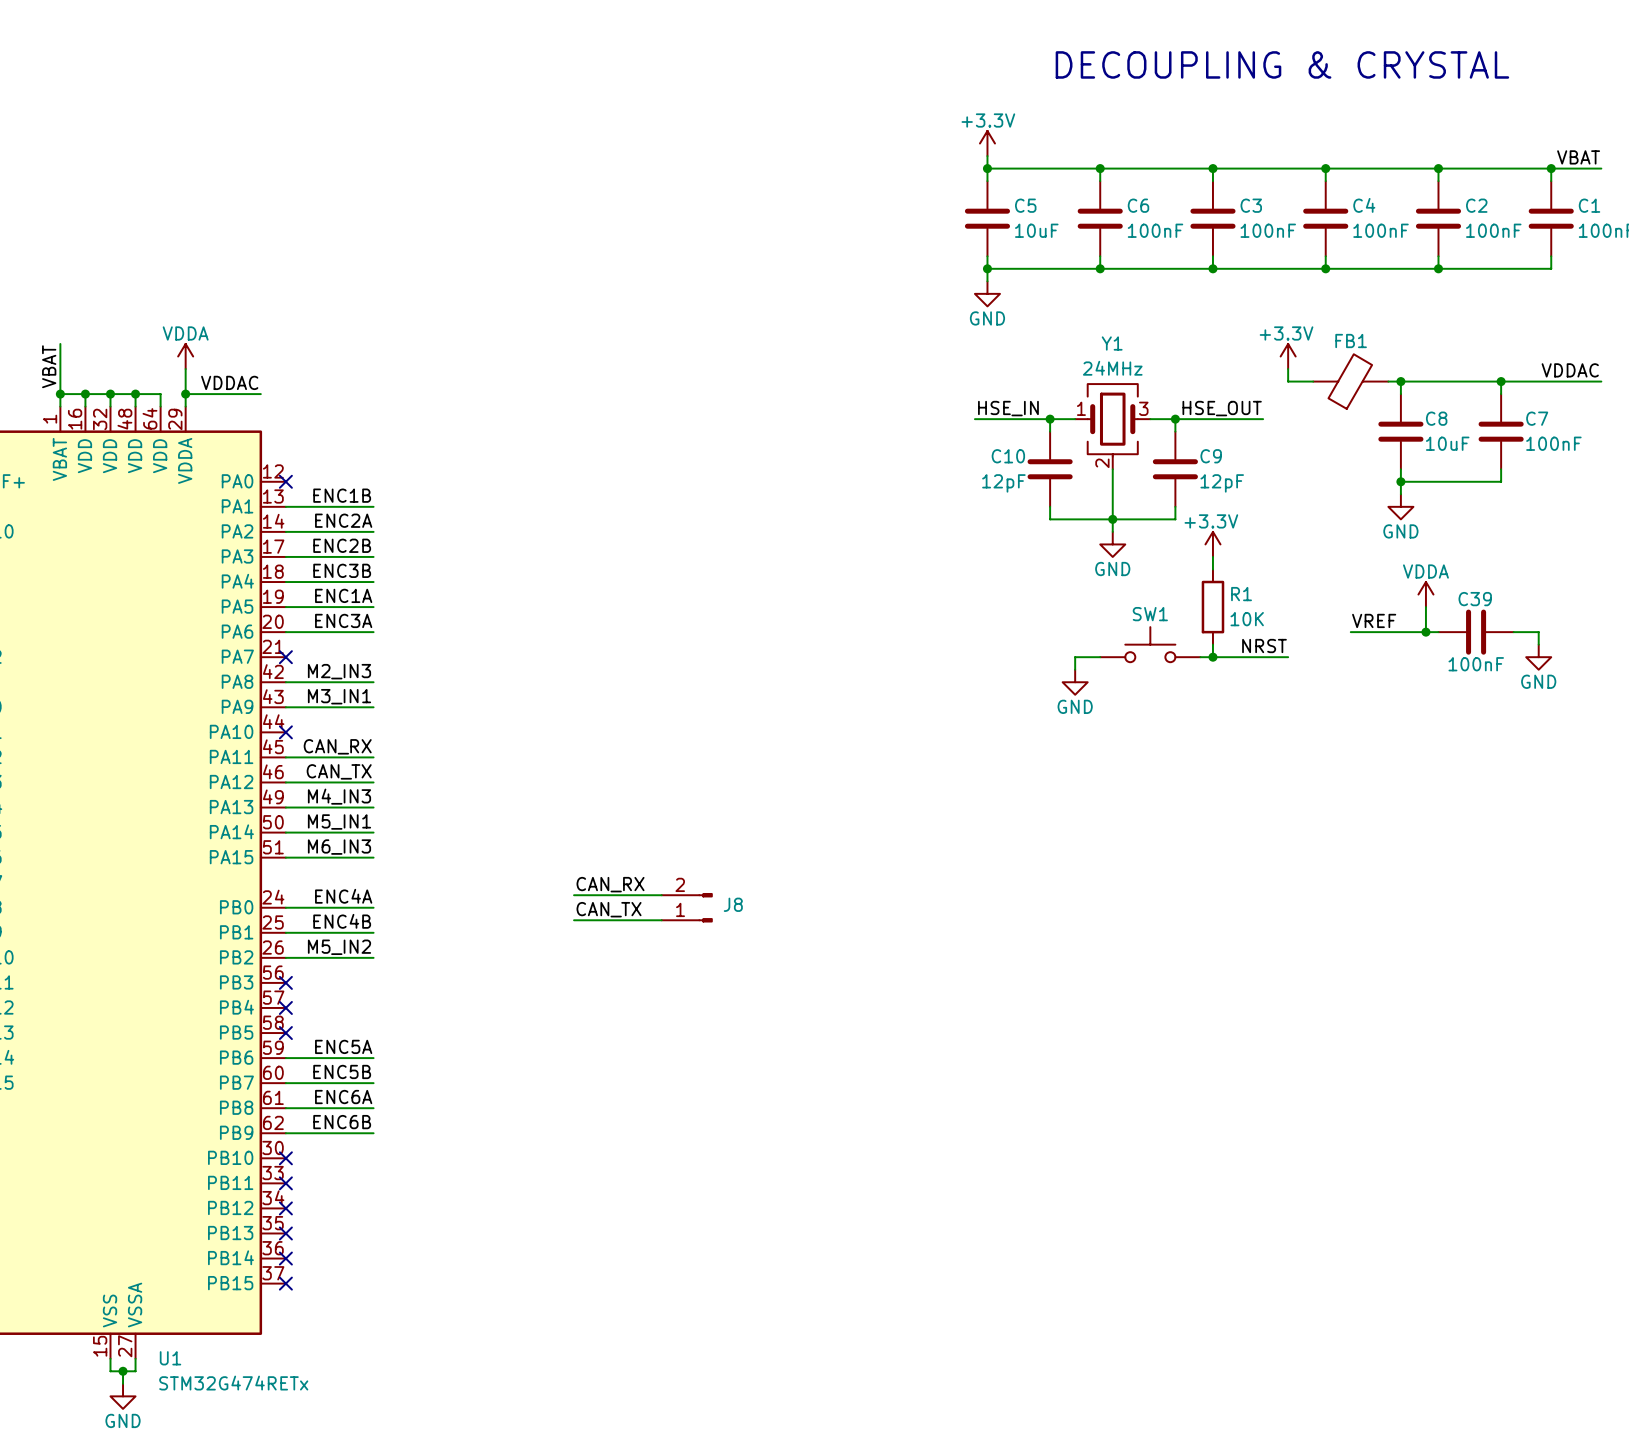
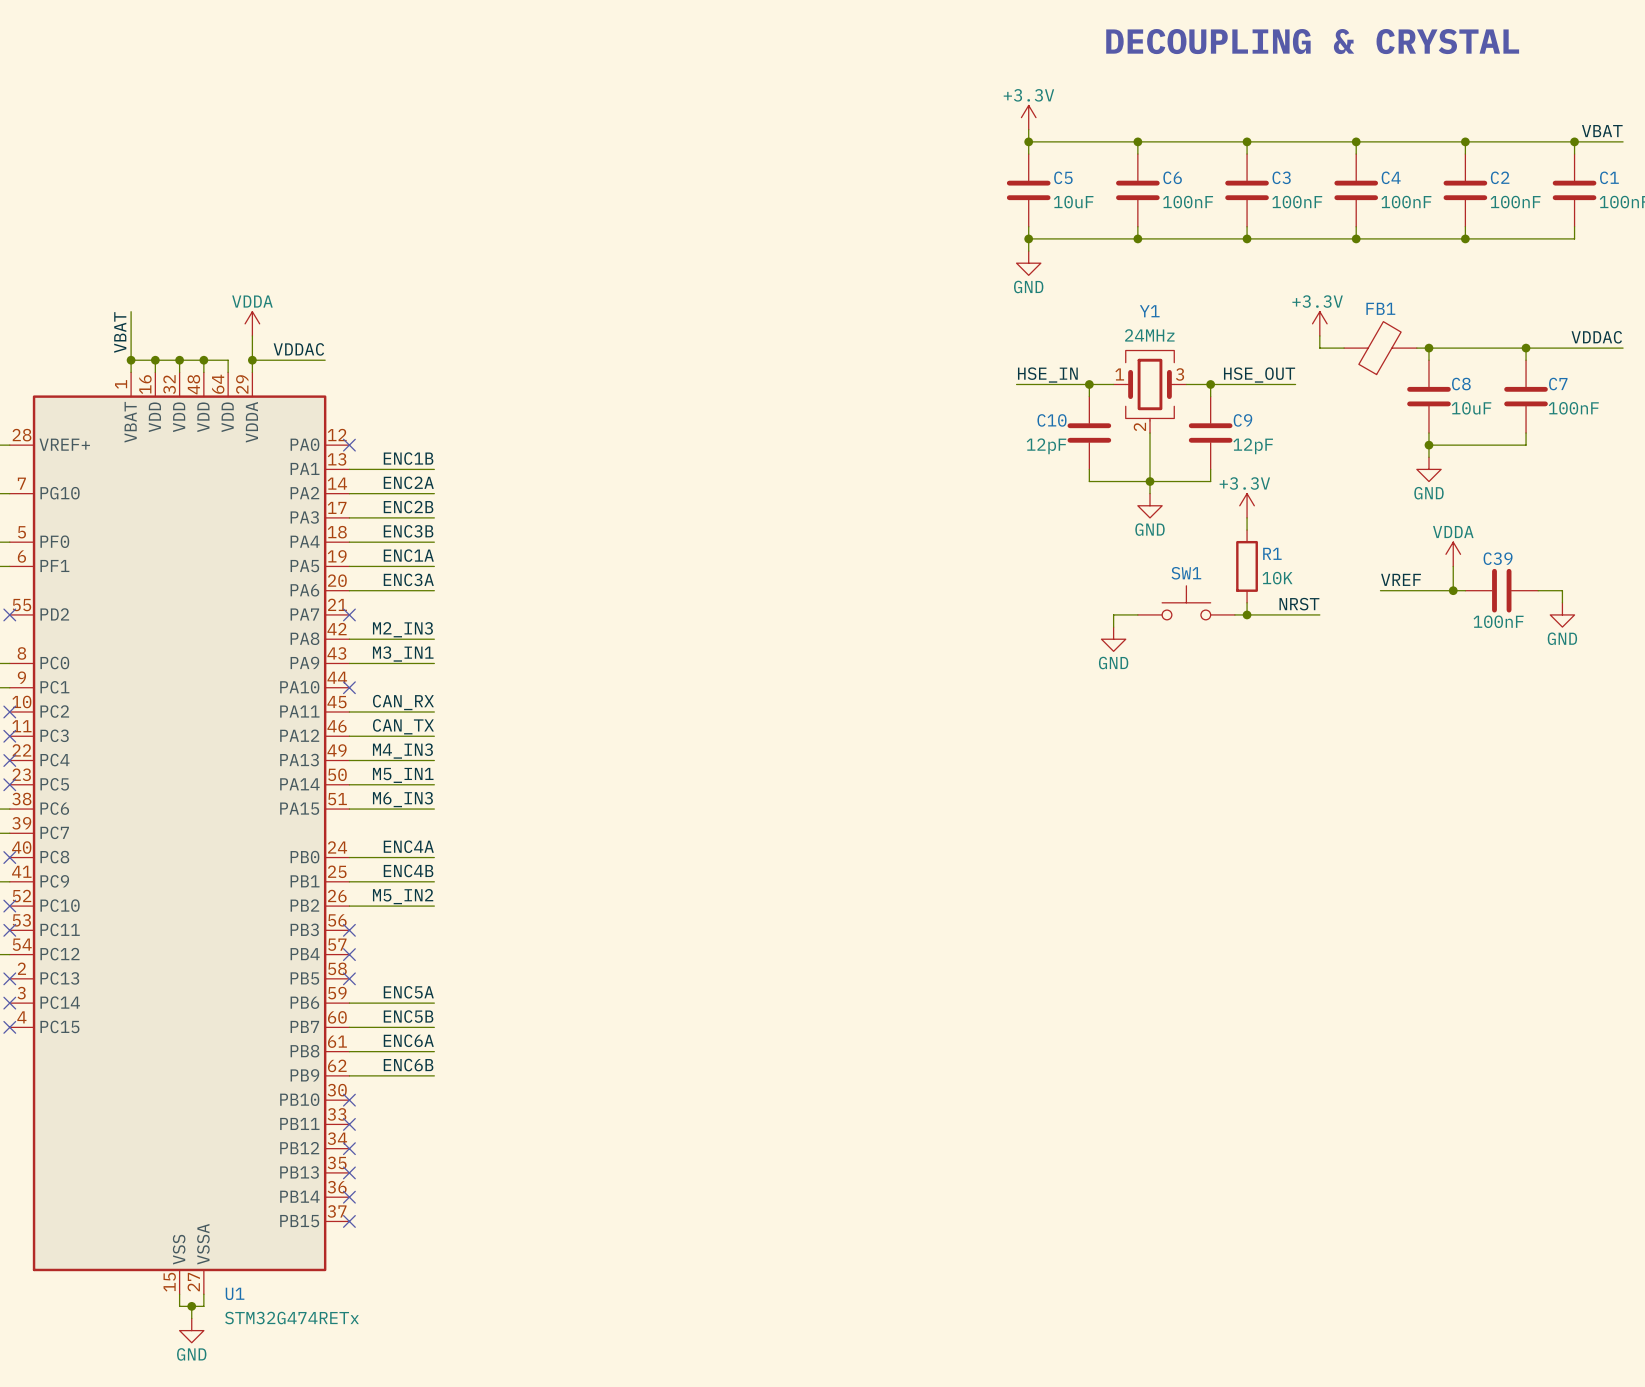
label: CAN_RX (610, 884) -> none
wire: (574, 895) (661, 895) -> none
J8: (687, 907) -> none
label: CAN_TX (609, 909) -> none
wire: (574, 920) (661, 920) -> none

